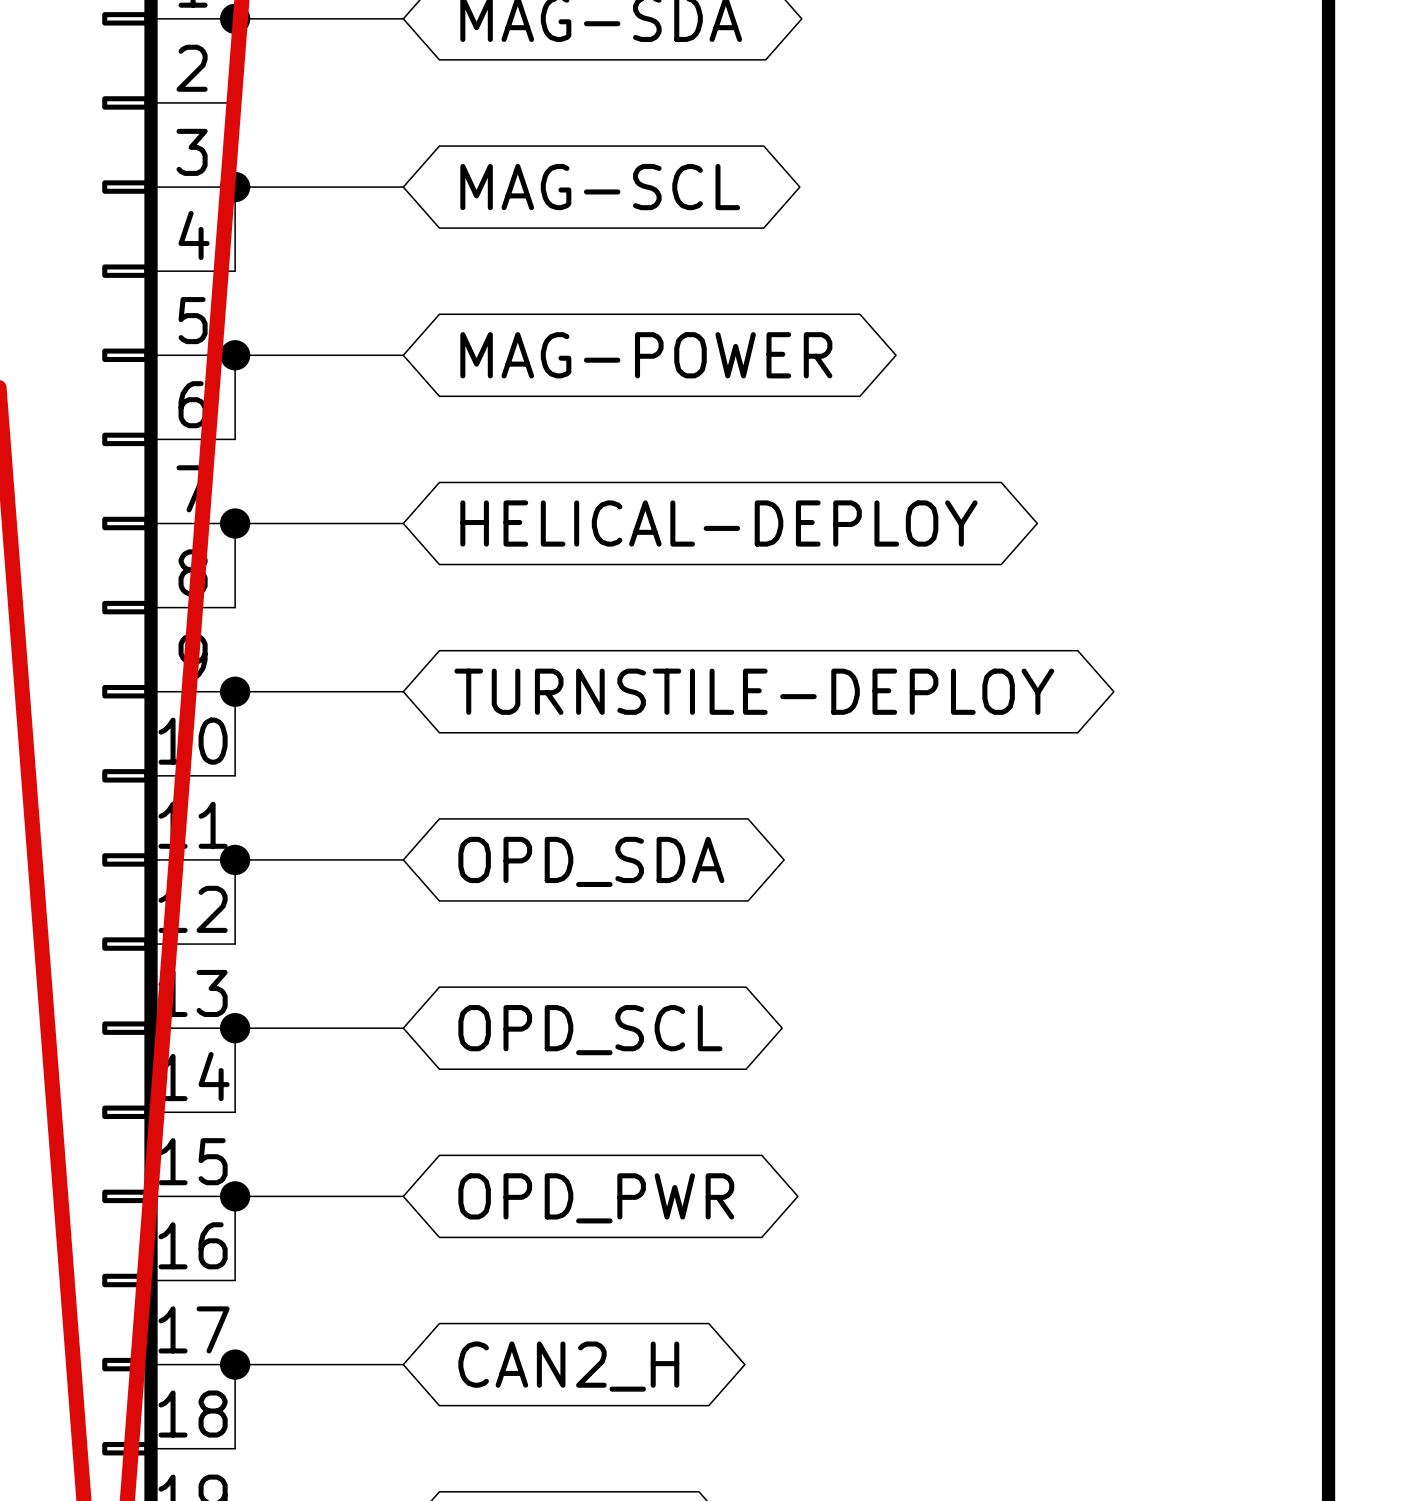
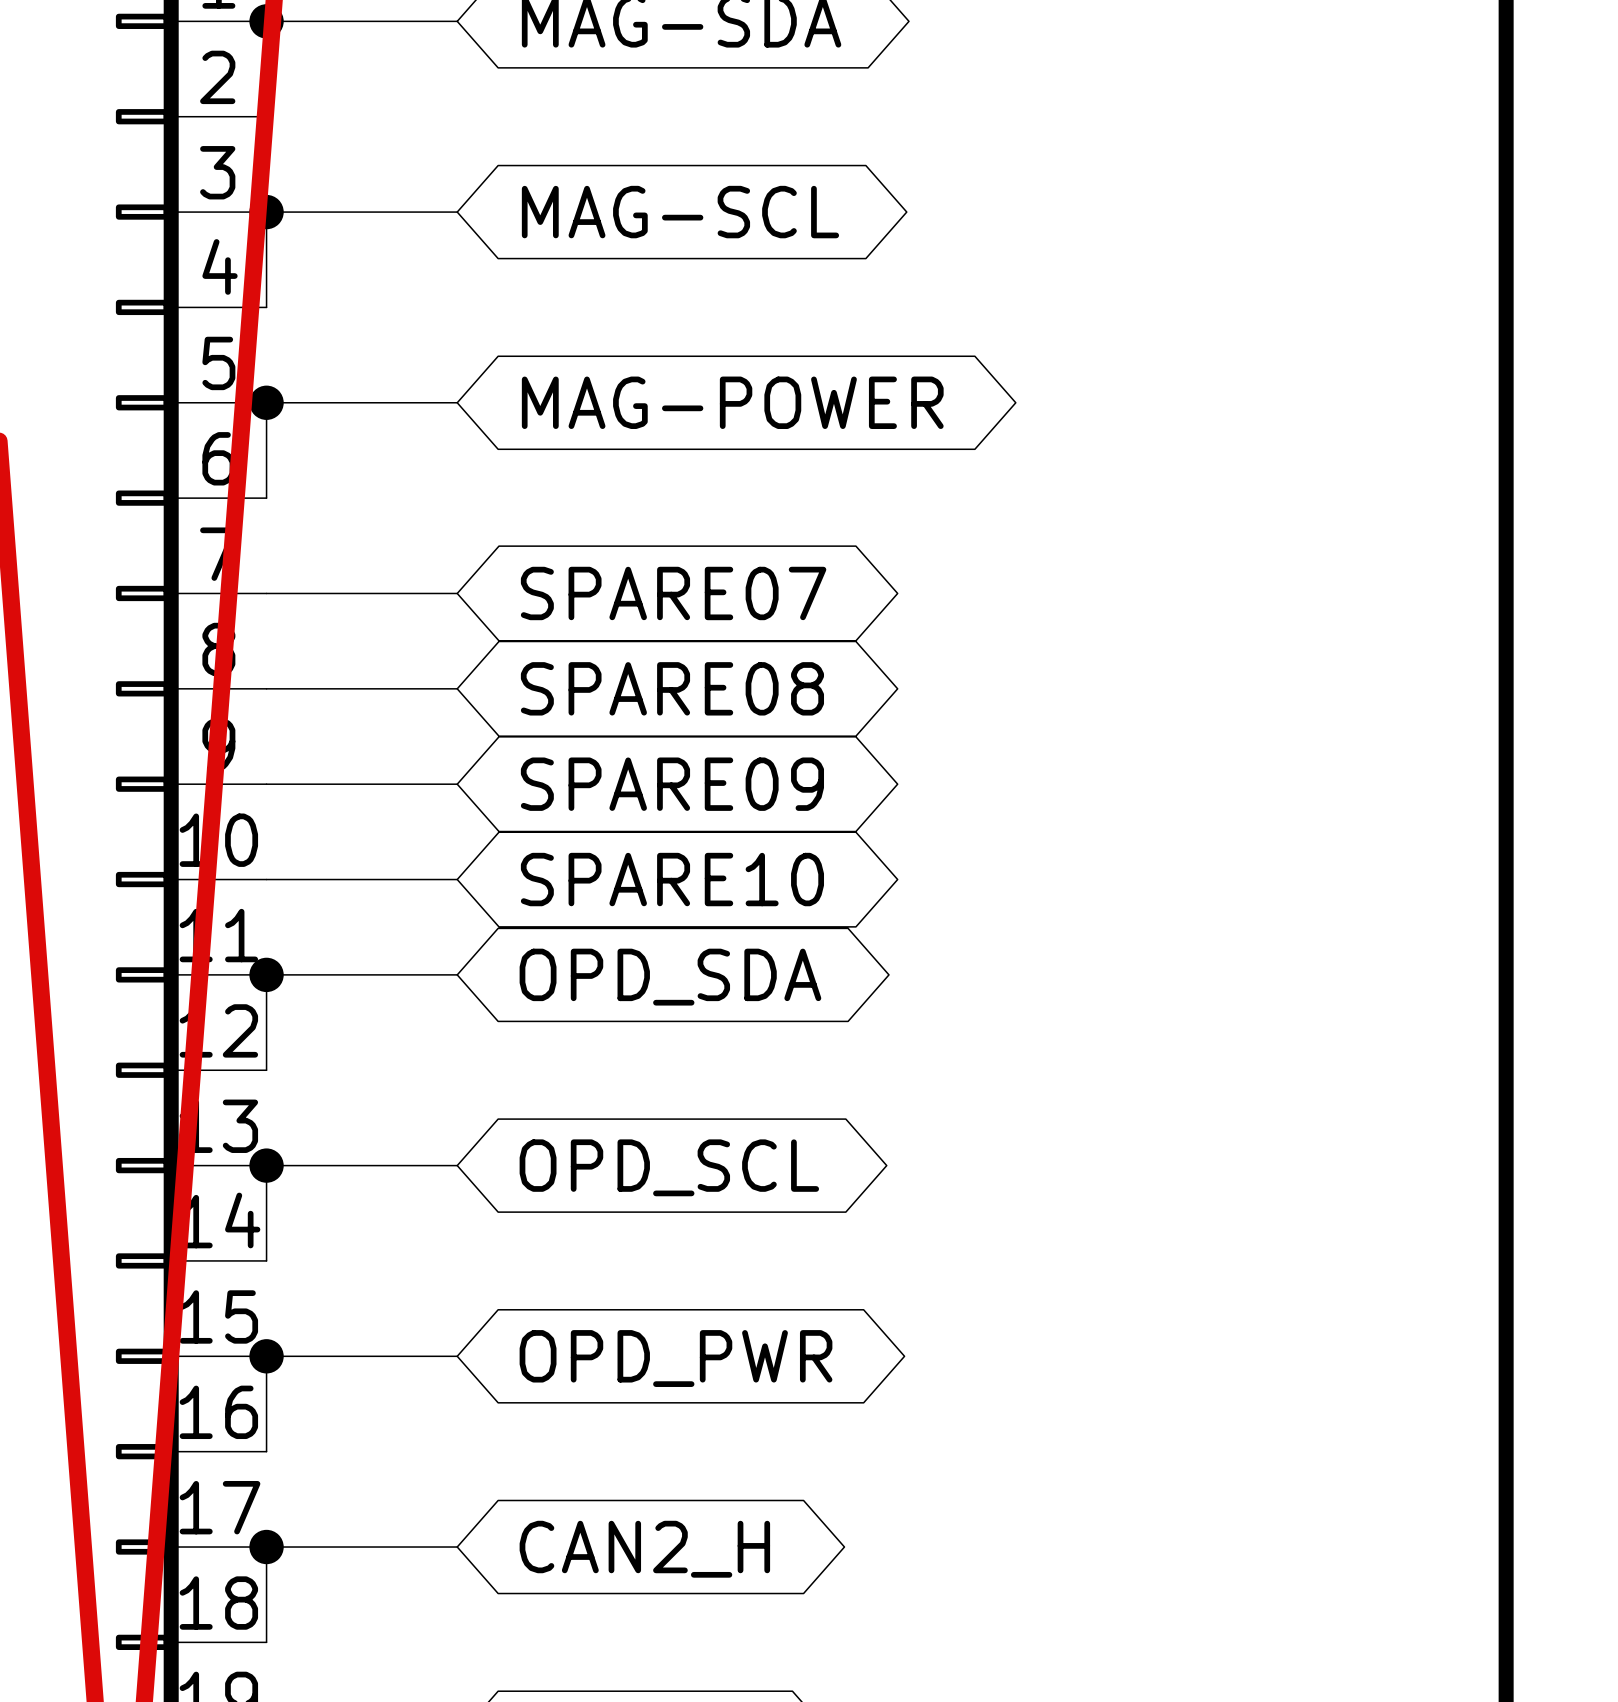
wire: (235, 523) (235, 607) -> (457, 688) (266, 688)
junction: (235, 523) -> none
global label: HELICAL-DEPLOY (718, 523) -> SPARE07 (673, 593)
global label: none -> SPARE08 (672, 688)
wire: (235, 691) (235, 775) -> (457, 879) (266, 879)
junction: (235, 691) -> none
global label: TURNSTILE-DEPLOY (754, 691) -> SPARE09 (672, 784)
global label: none -> SPARE10 (672, 879)

